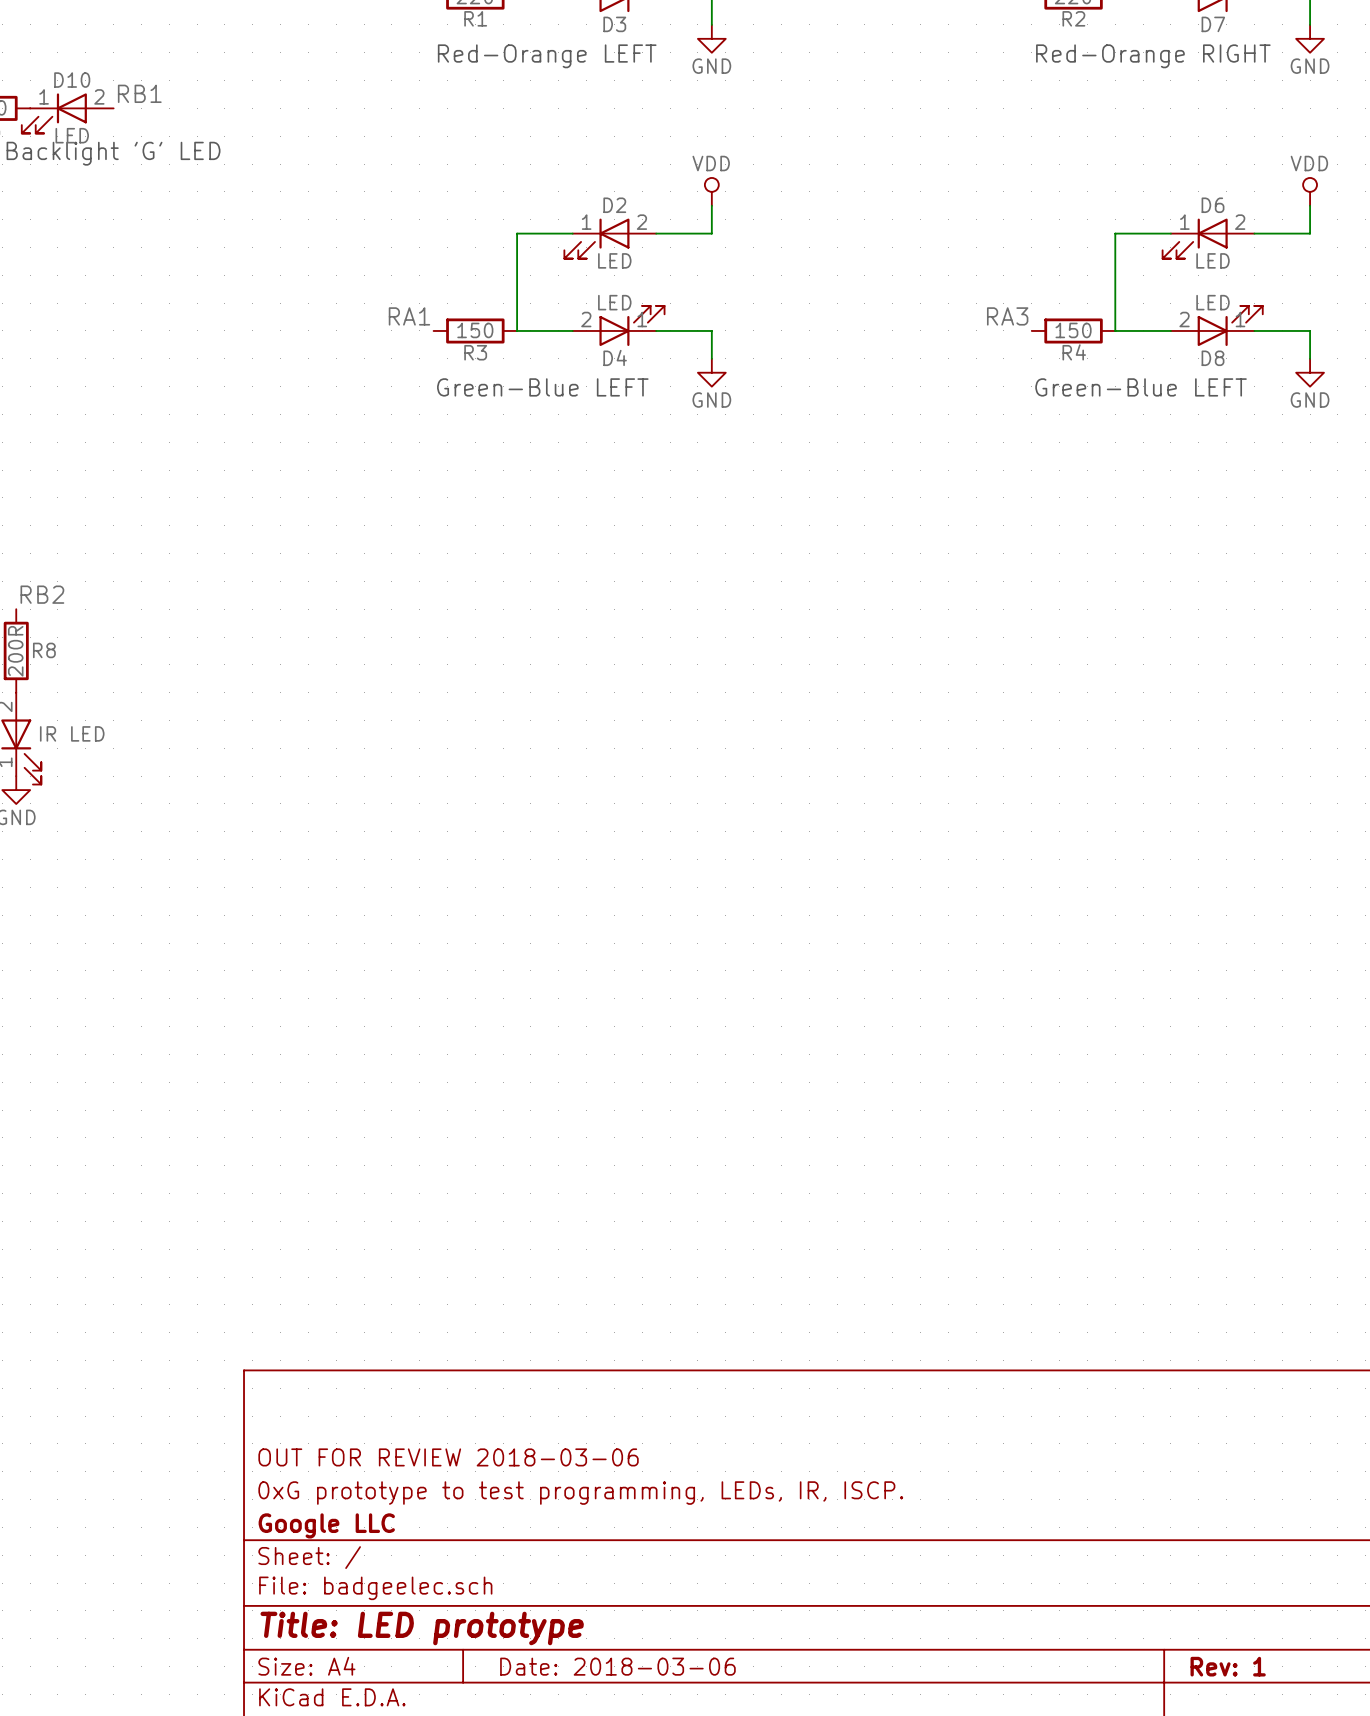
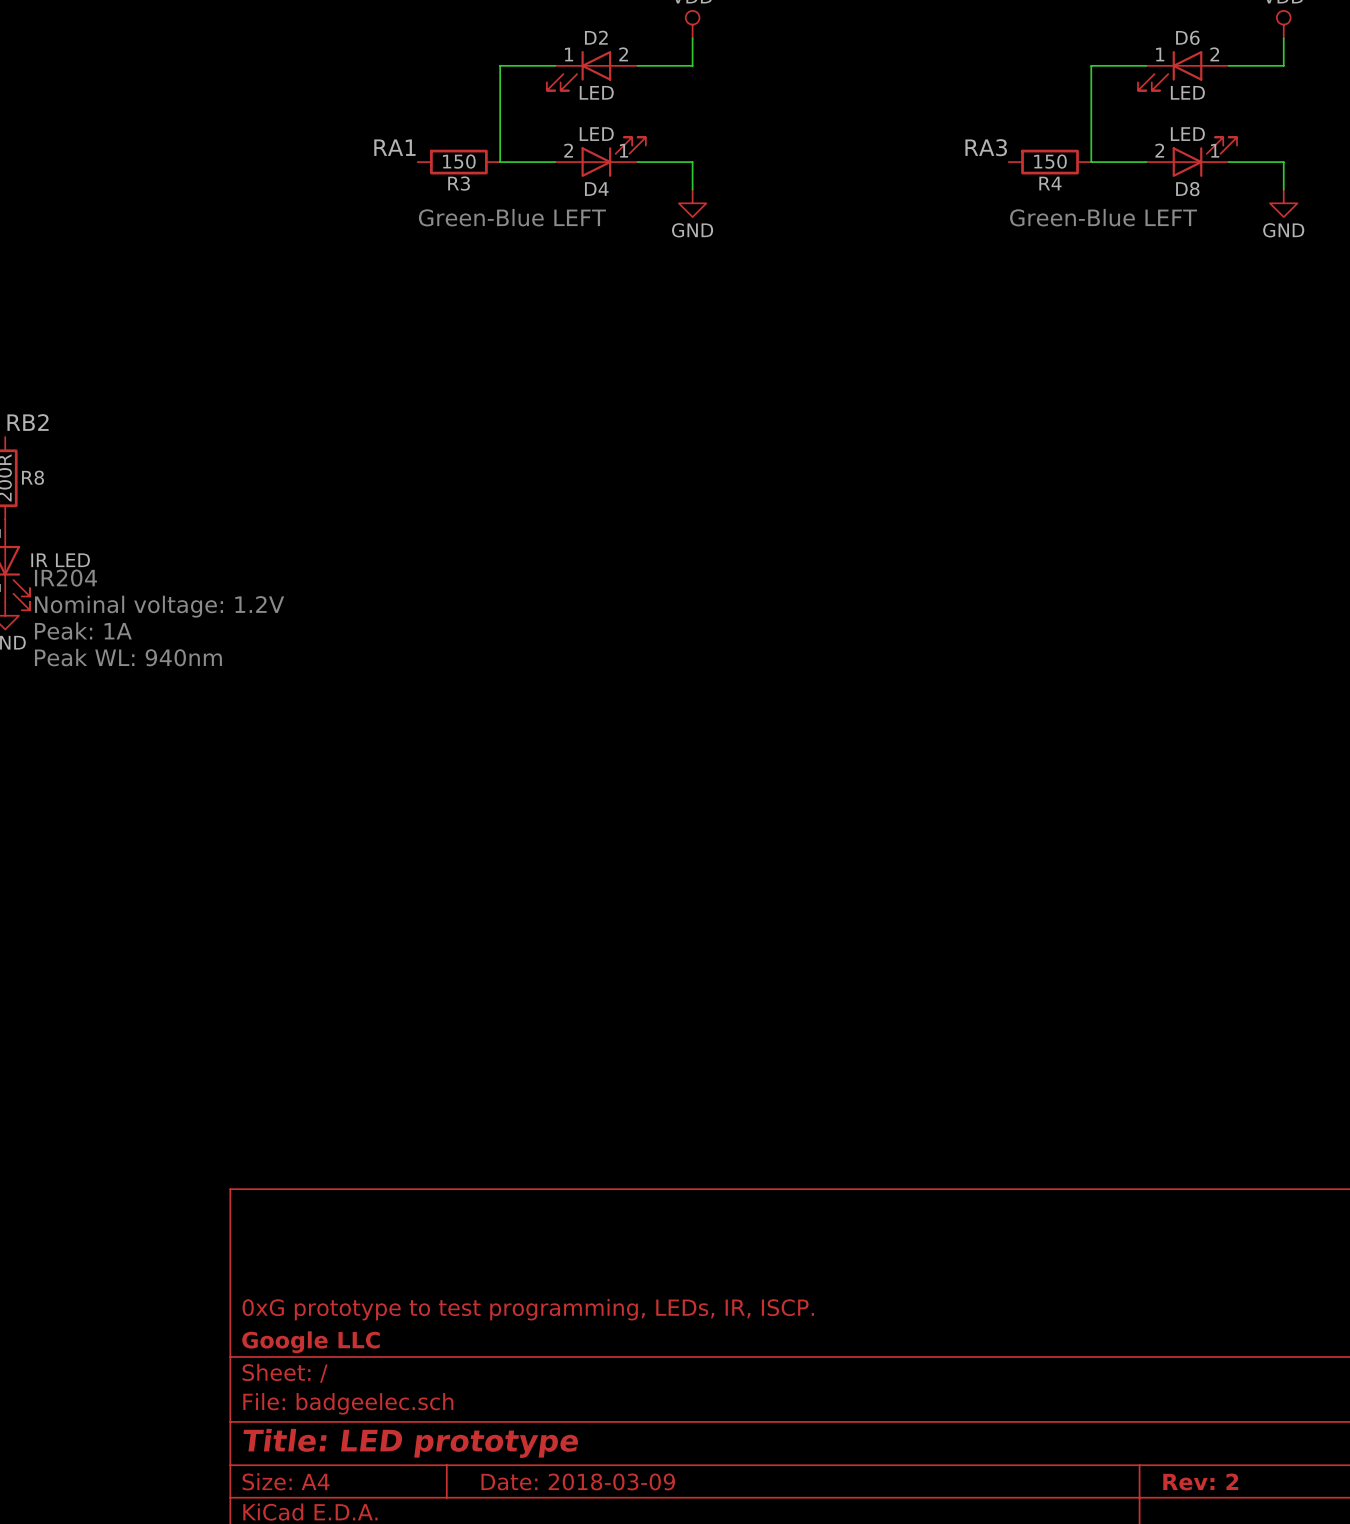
text: none -> IR204 (66, 578)
text: none -> Nominal voltage: 1.2V (159, 606)
text: none -> Peak: 1A (83, 631)
text: none -> Peak WL: 940nm (128, 657)
title block: OUT FOR REVIEW 2018-03-06 (448, 1457) -> none
title block: Date: 2018-03-06 (617, 1666) -> Date: 2018-03-09 (578, 1481)
title block: Rev: 1 (1228, 1666) -> Rev: 2 (1200, 1481)

